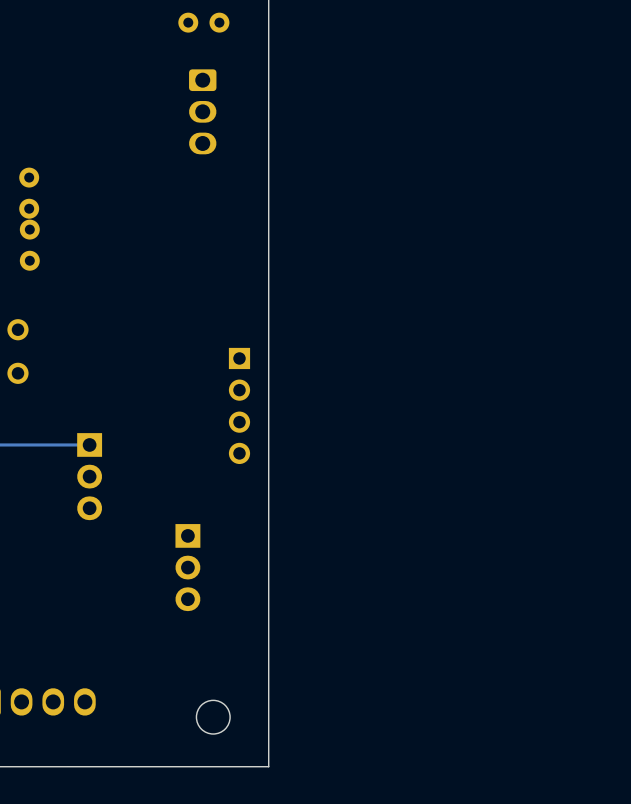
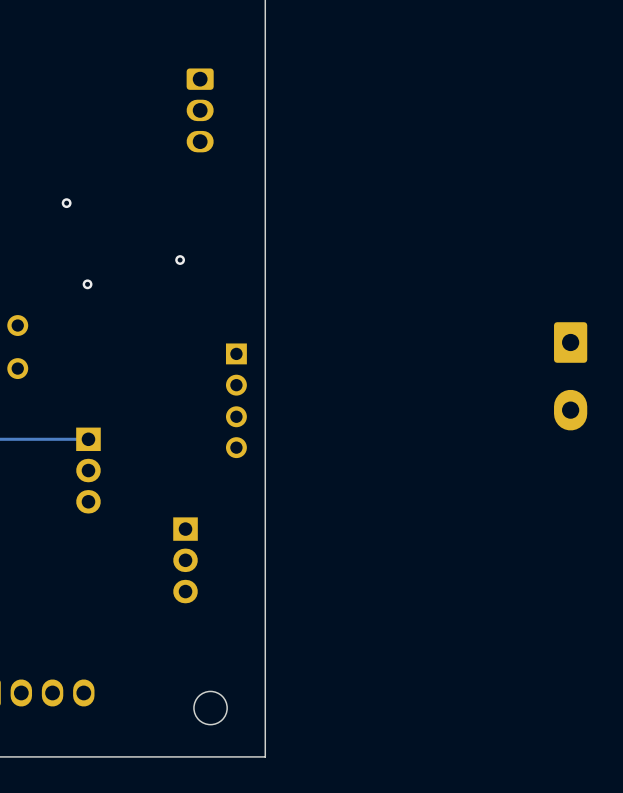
part: (203, 22) -> none
part: (29, 193) -> none
via: none -> (66, 203)
part: (29, 245) -> none
via: none -> (180, 260)
via: none -> (87, 284)
part: none -> (570, 376)

